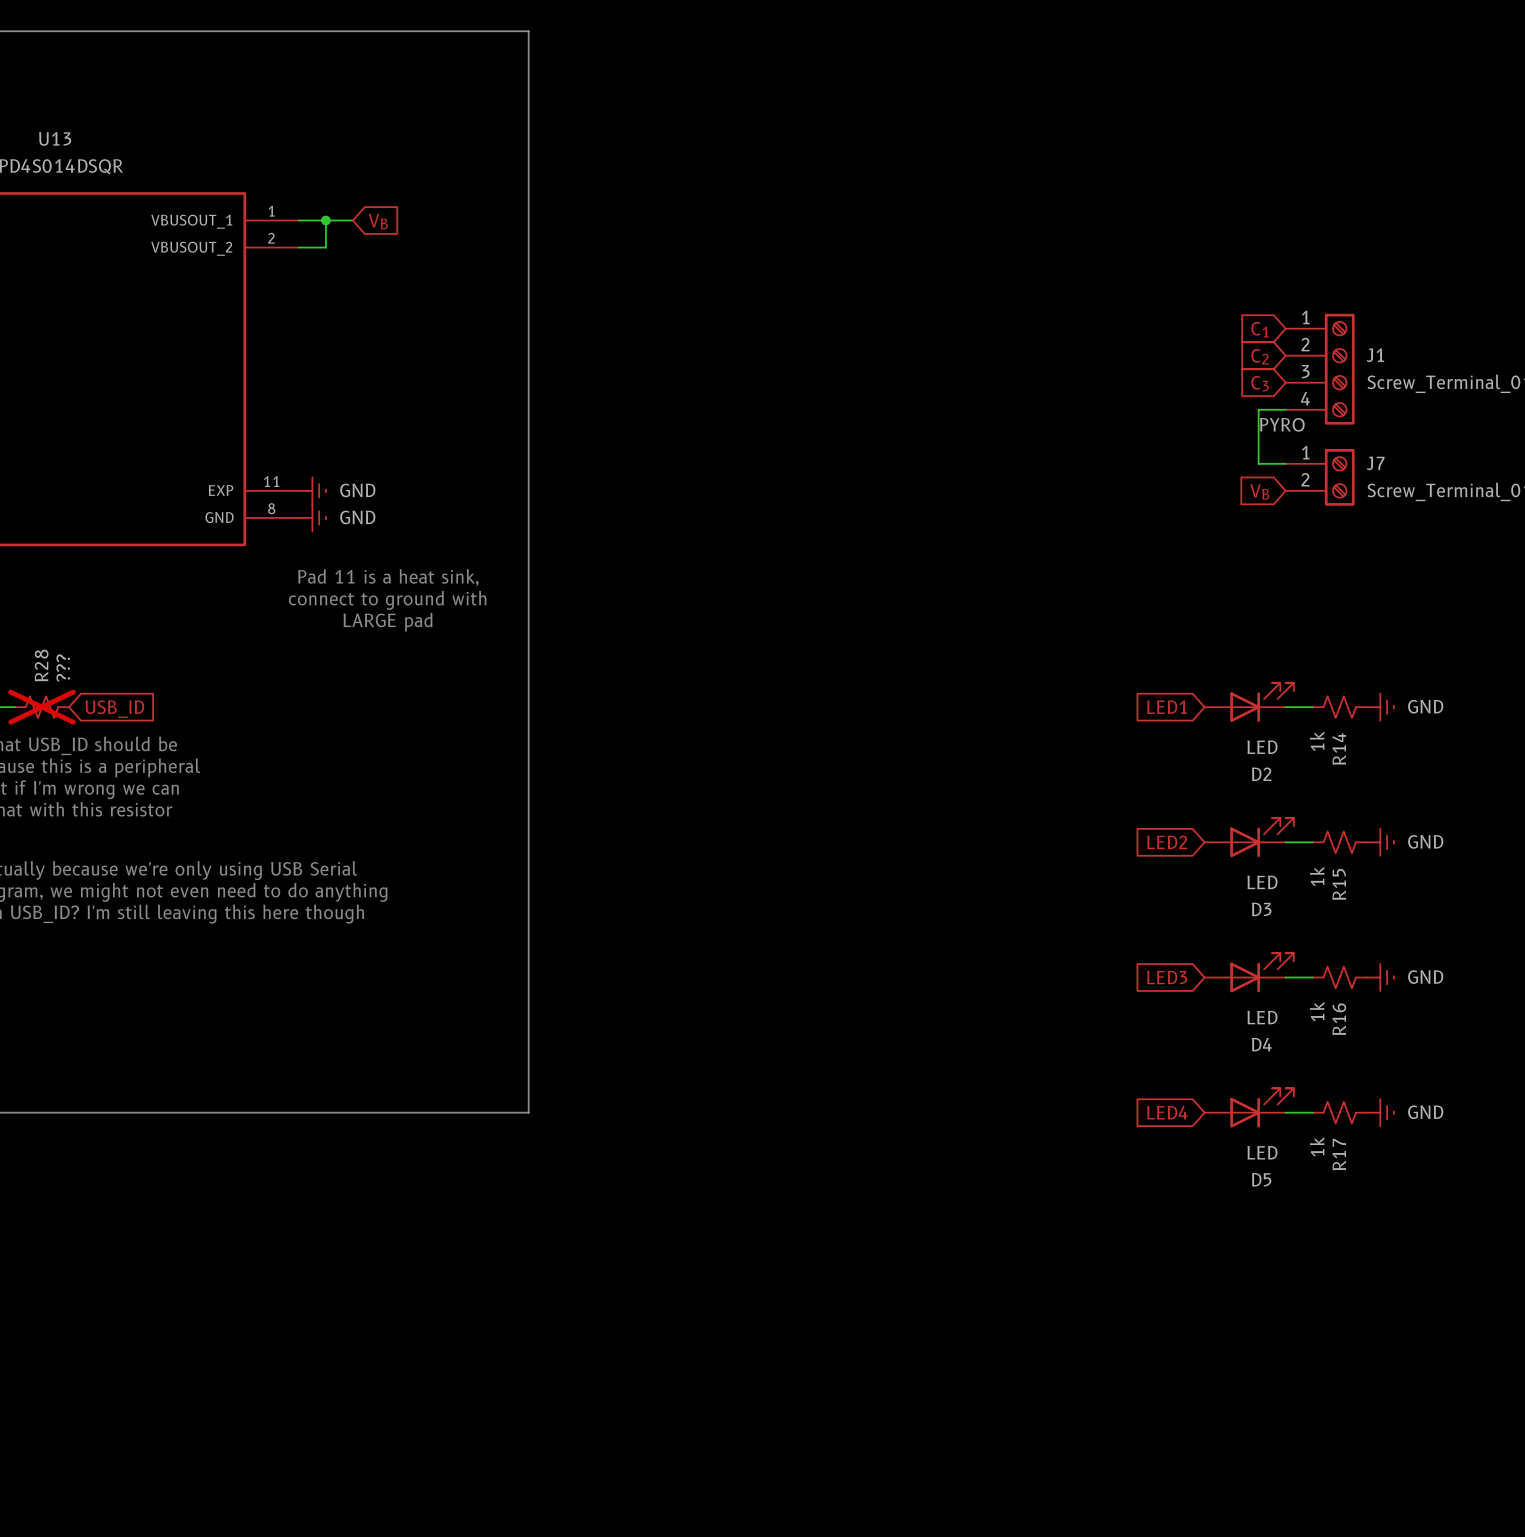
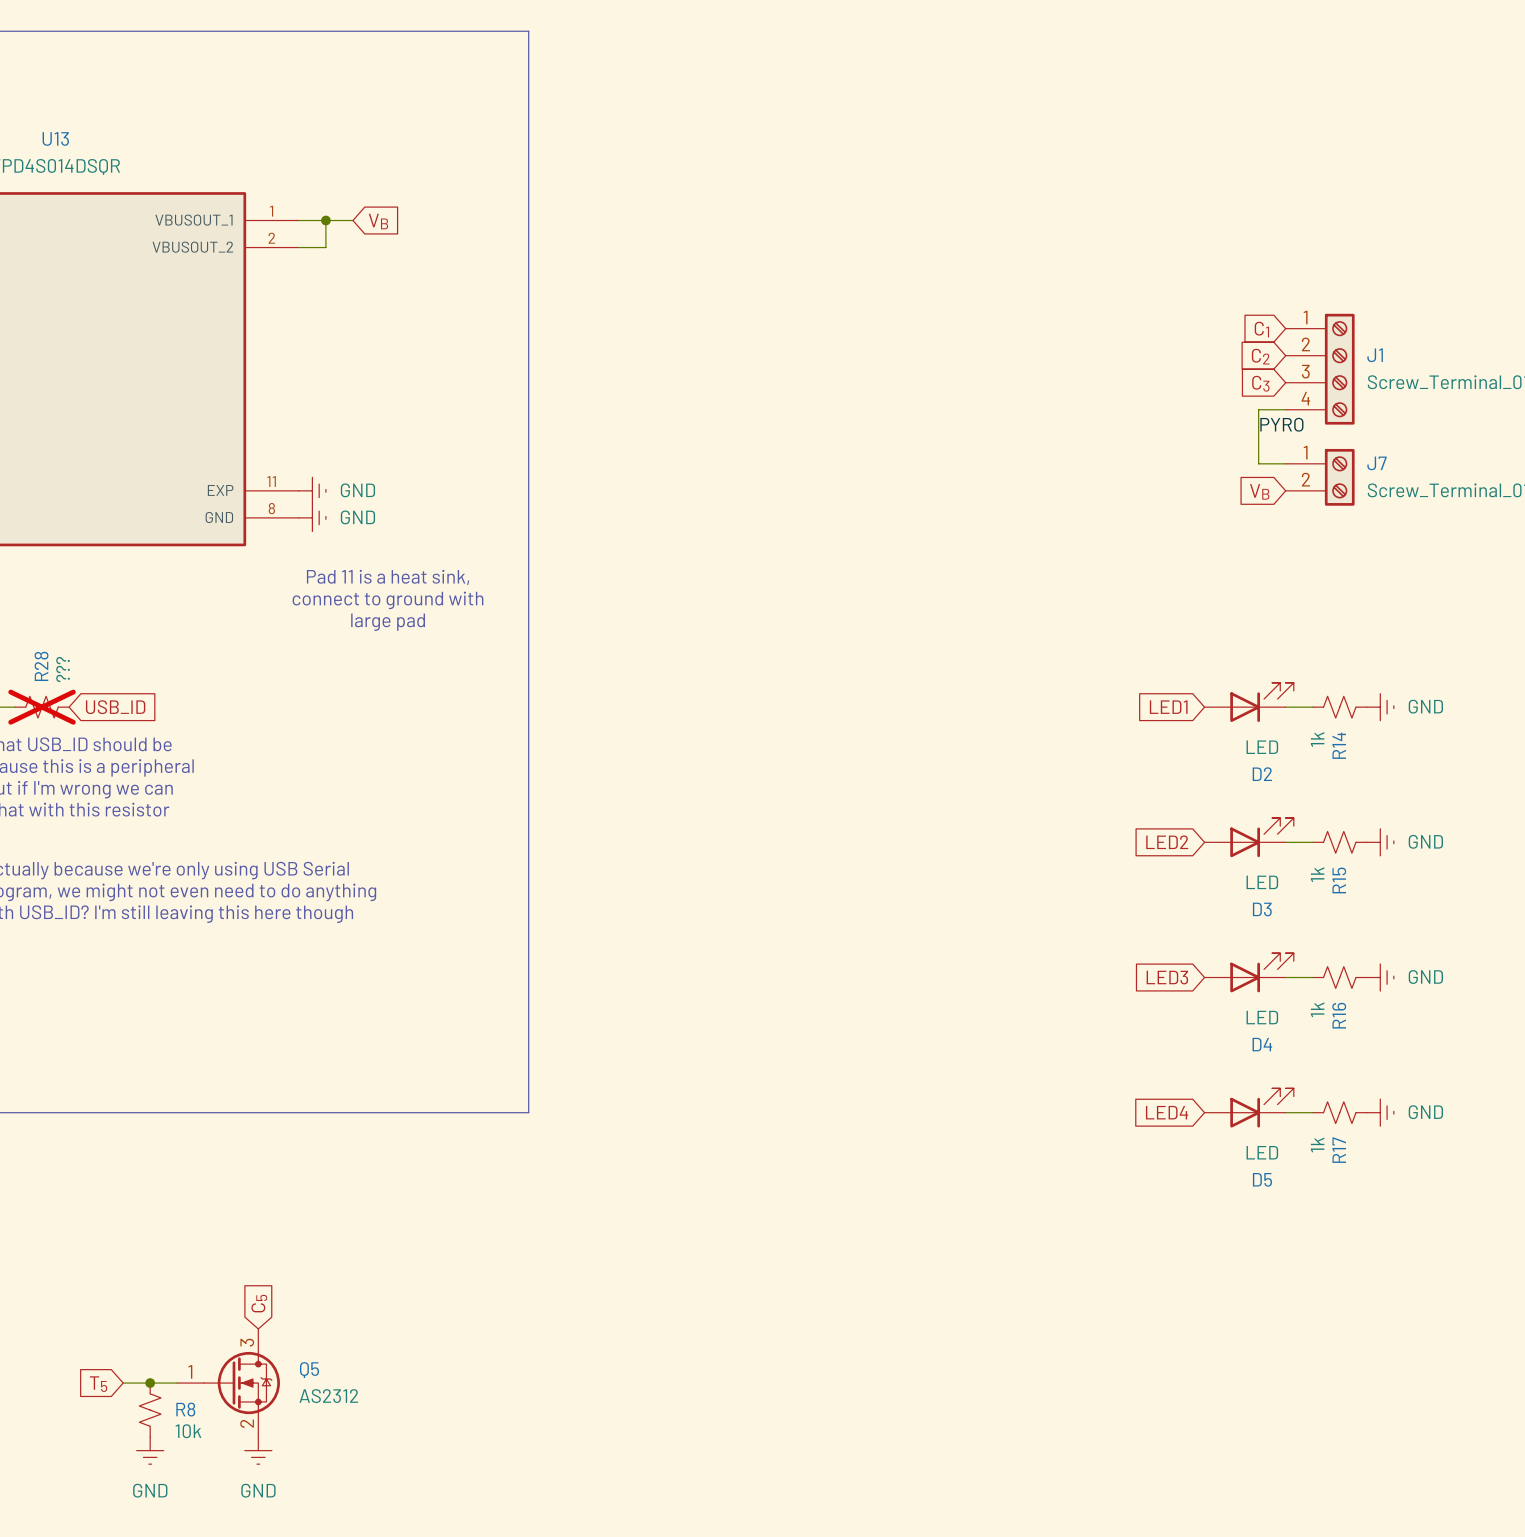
text: LARGE pad (388, 622) -> large pad (388, 622)
global label: none -> C5 (259, 1303)
wire: none -> (123, 1383) (177, 1383)
junction: none -> (150, 1383)
Q5: none -> AS2312 (228, 1383)
global label: none -> T5 (98, 1384)
R8: none -> 10k (150, 1410)
power symbol: none -> GND (150, 1450)
power symbol: none -> GND (258, 1450)

